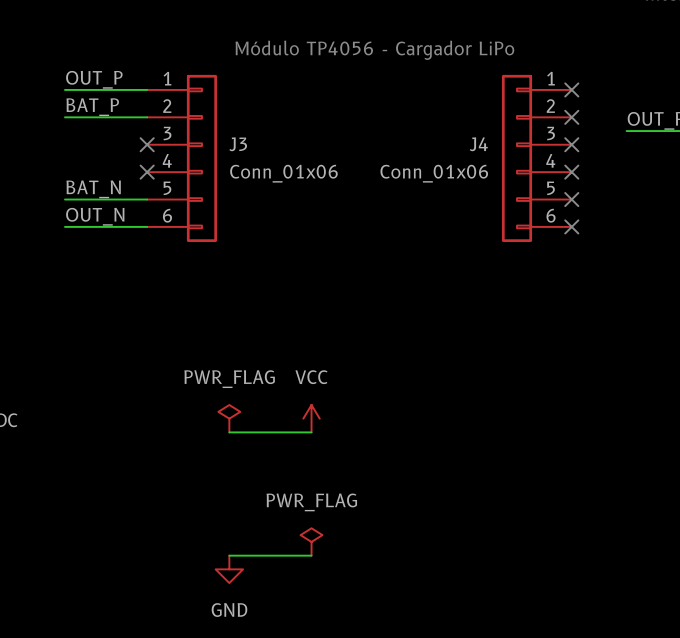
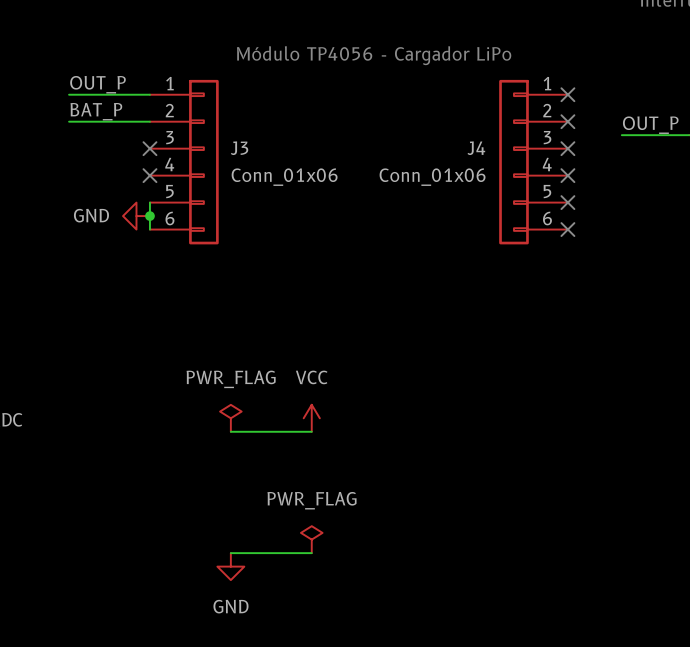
label: BAT_N (93, 189) -> none
wire: (64, 199) (147, 199) -> (149, 229) (149, 202)
power symbol: none -> GND (136, 216)
junction: none -> (149, 216)
label: OUT_N (95, 216) -> none
wire: (64, 226) (147, 226) -> none

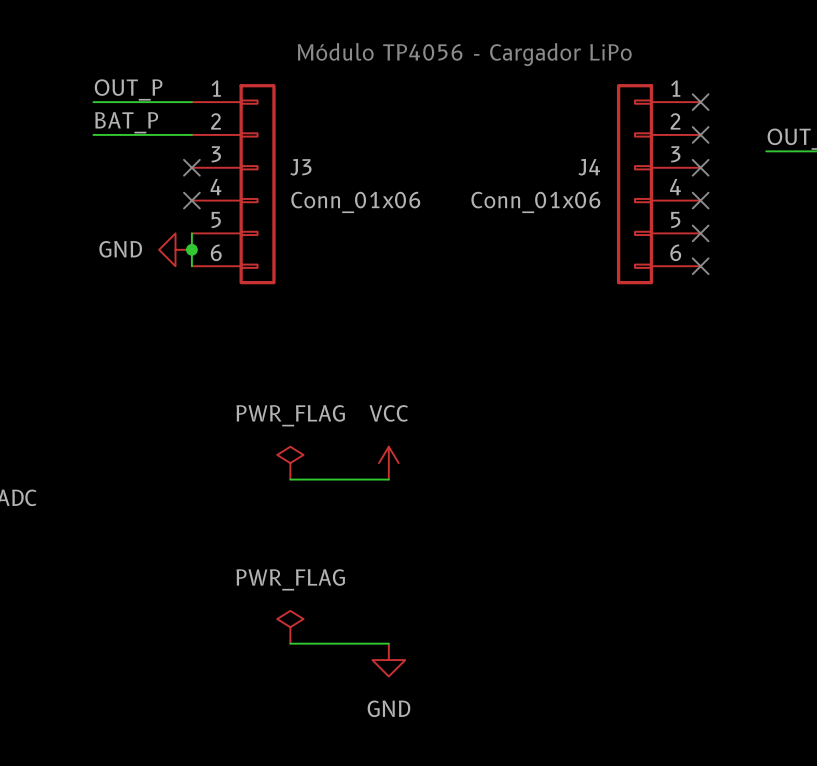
power symbol position: PWR_FLAG (230, 418) -> PWR_FLAG (290, 463)
power symbol position: VCC (311, 418) -> VCC (388, 463)
wire: (230, 431) (311, 431) -> (290, 479) (388, 479)
power symbol: none -> PWR_FLAG (290, 627)
power symbol: PWR_FLAG (311, 539) -> none
wire: (230, 553) (311, 553) -> (290, 643) (388, 643)
power symbol position: GND (230, 566) -> GND (388, 660)

